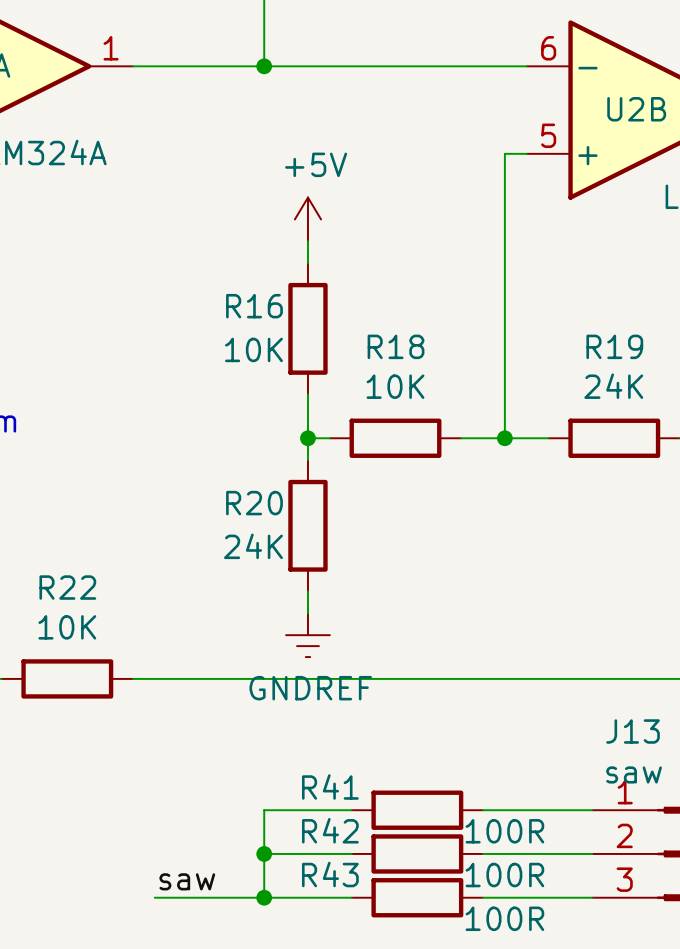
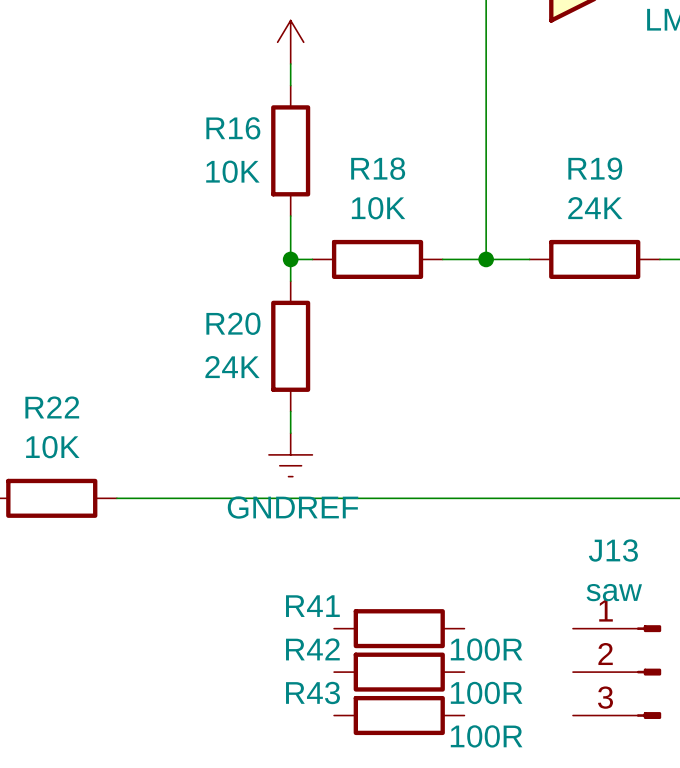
wire: (351, 810) (264, 810) (264, 897) -> none
wire: (483, 810) (592, 810) -> none
wire: (264, 853) (351, 853) -> none
junction: (264, 853) -> none
wire: (483, 853) (592, 853) -> none
label: saw (187, 881) -> none
wire: (154, 897) (351, 897) -> none
junction: (264, 897) -> none
wire: (483, 897) (592, 897) -> none

